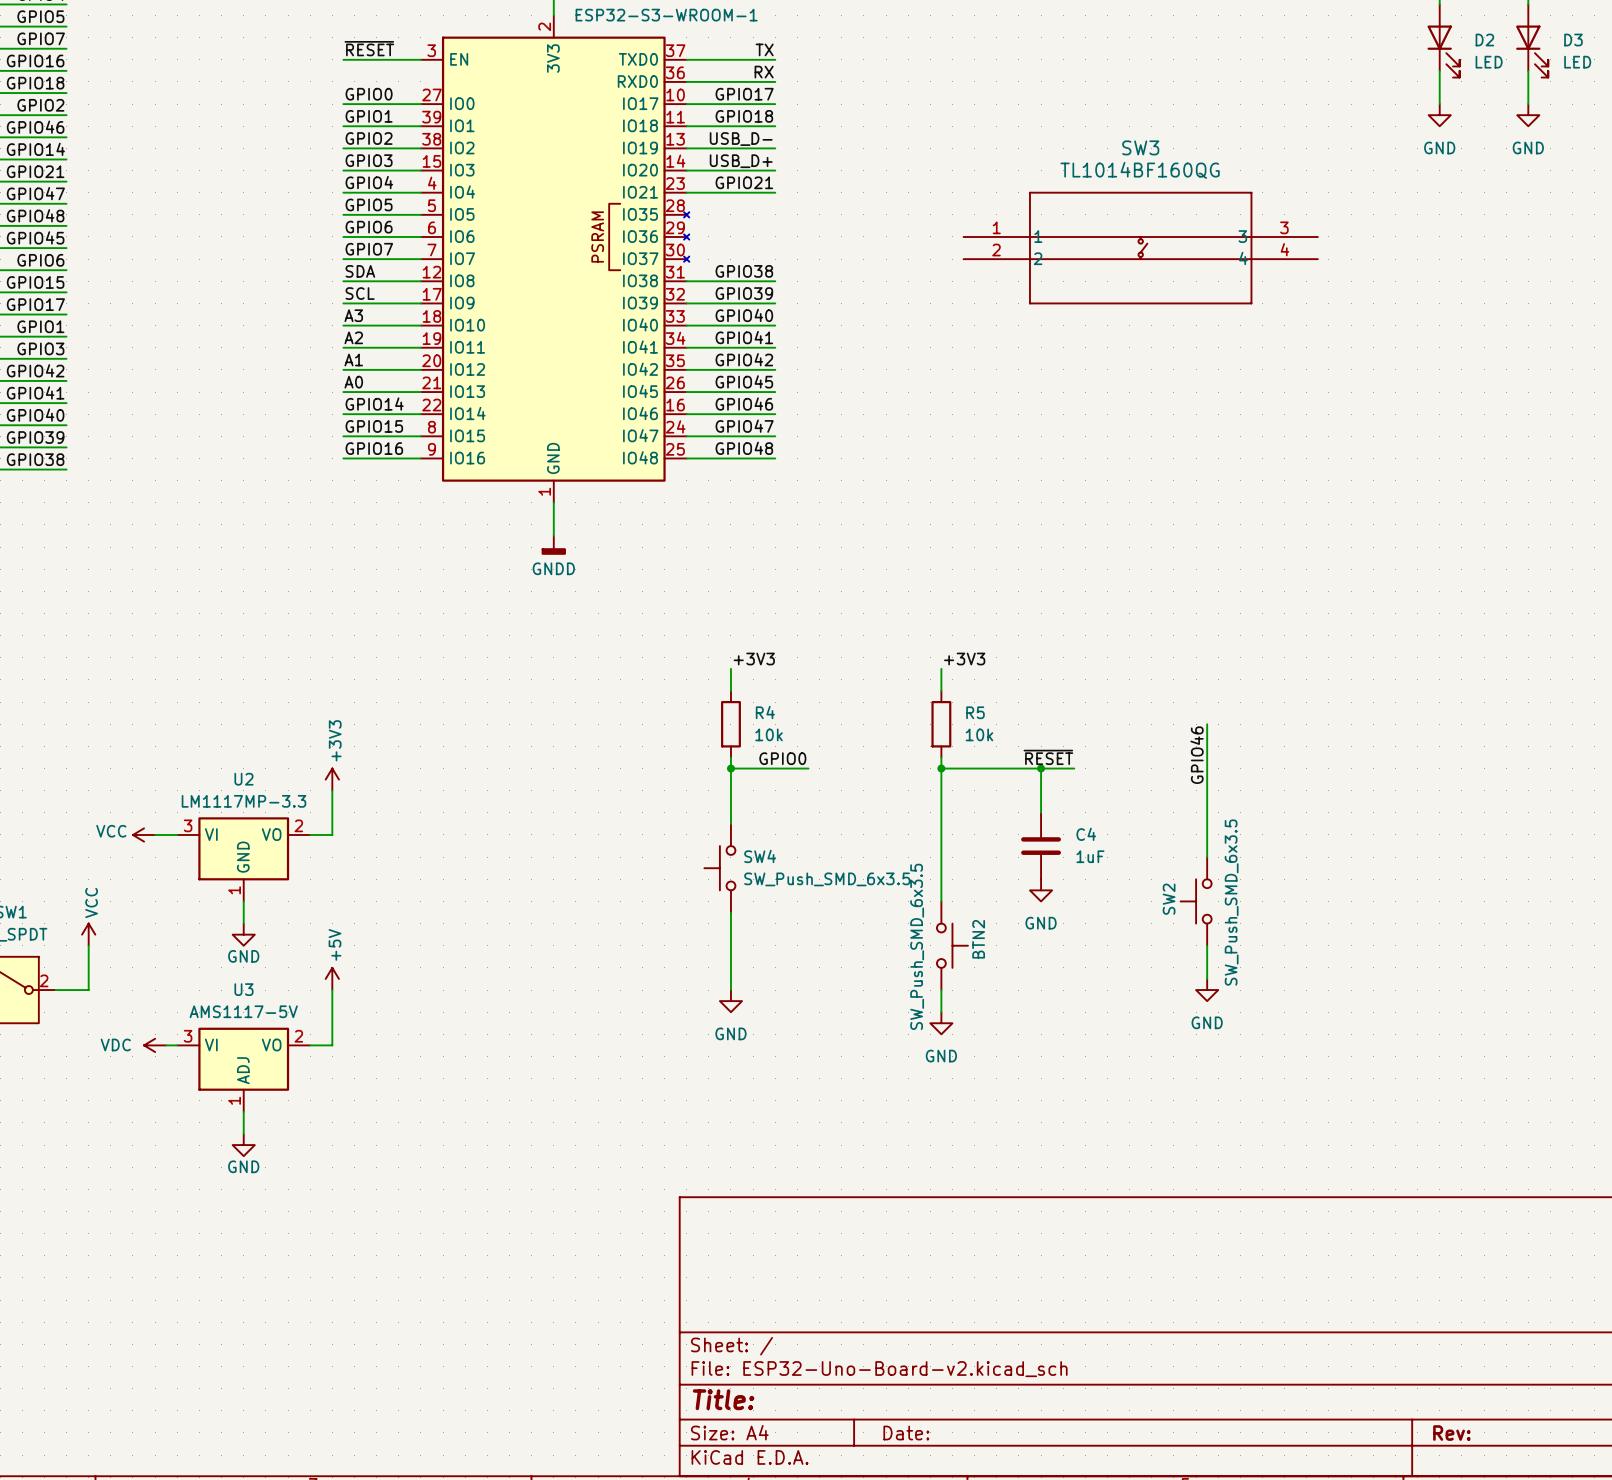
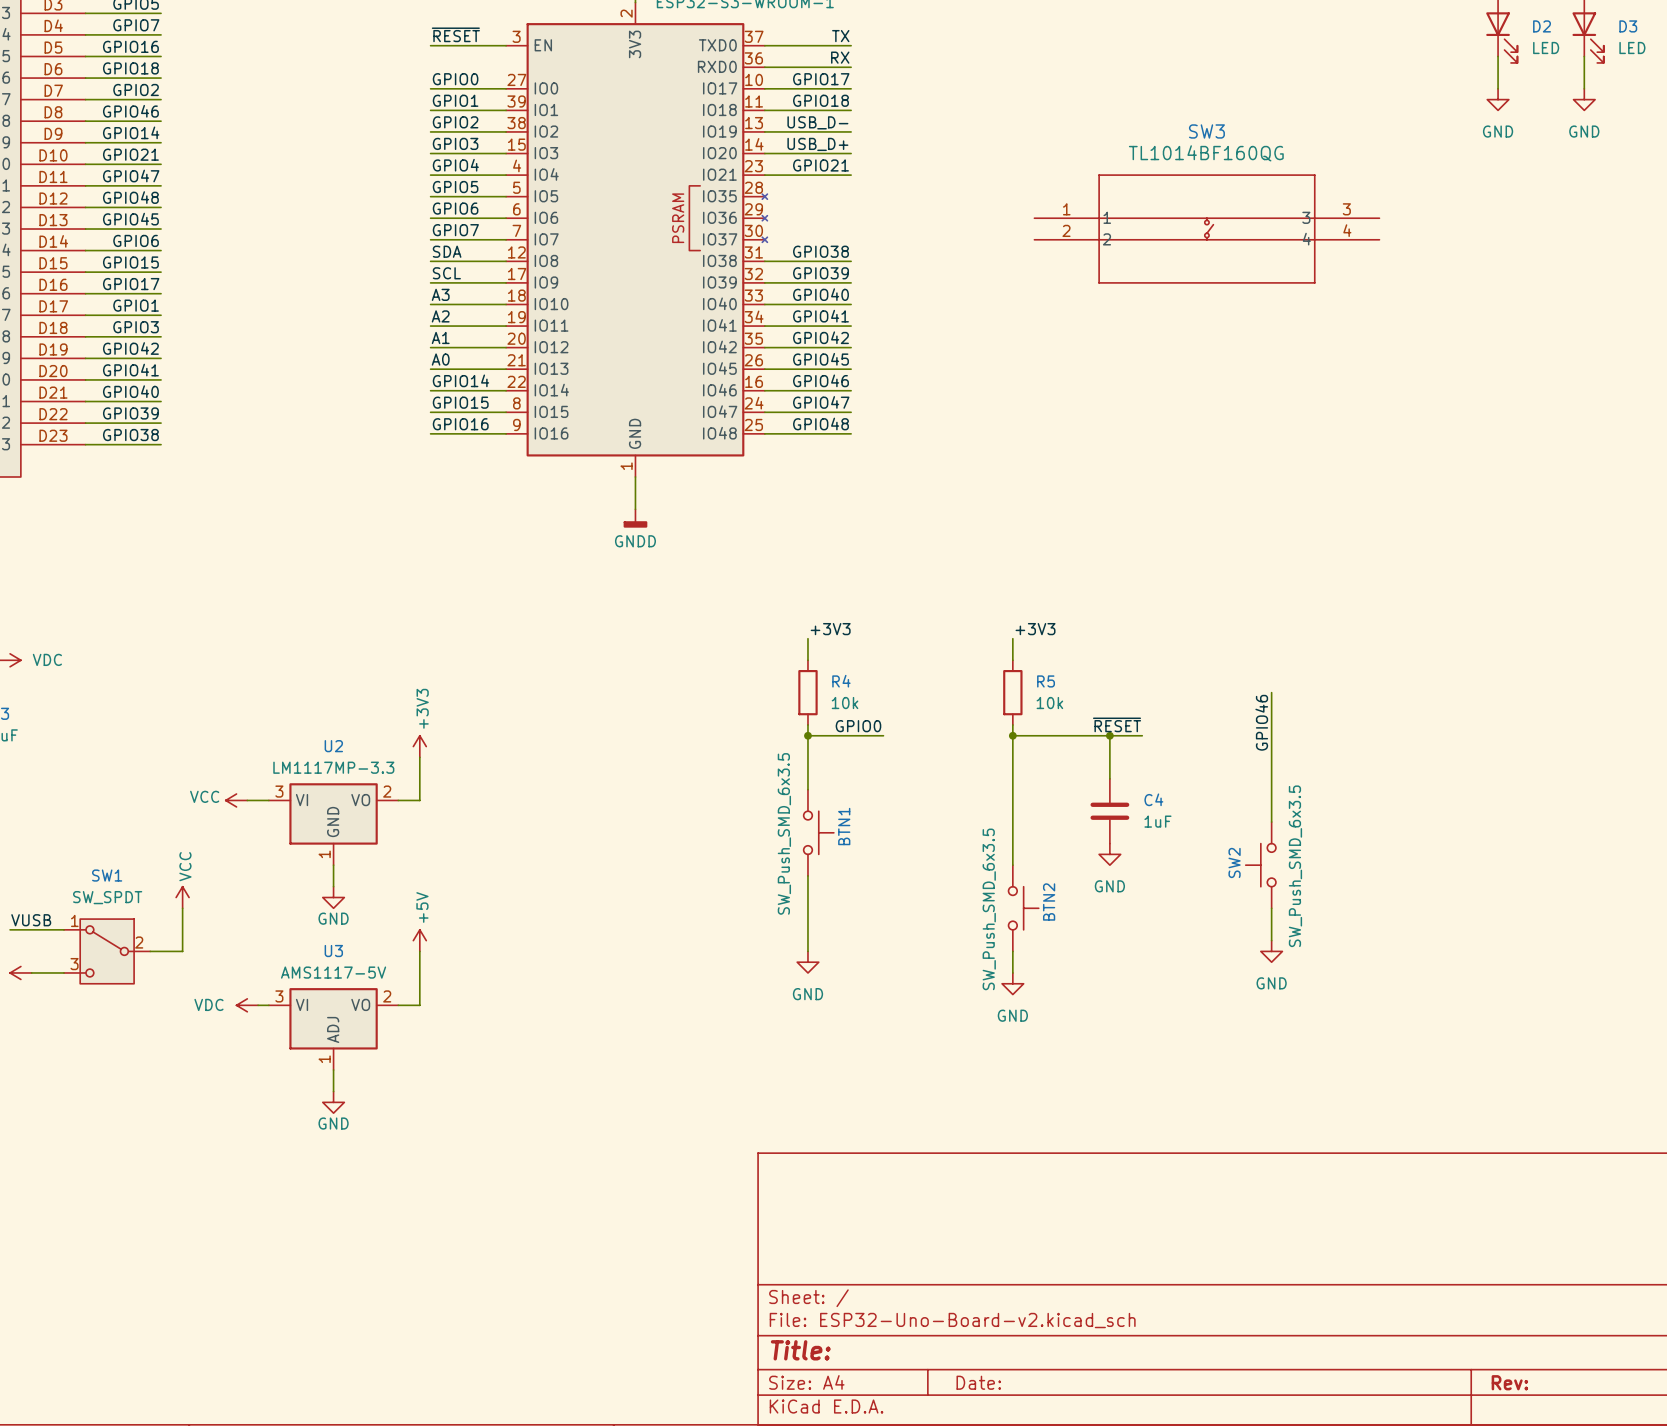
SW4: SW_Push_SMD_6x3.5 (719, 868) -> none
BTN1: none -> SW_Push_SMD_6x3.5 (818, 832)

